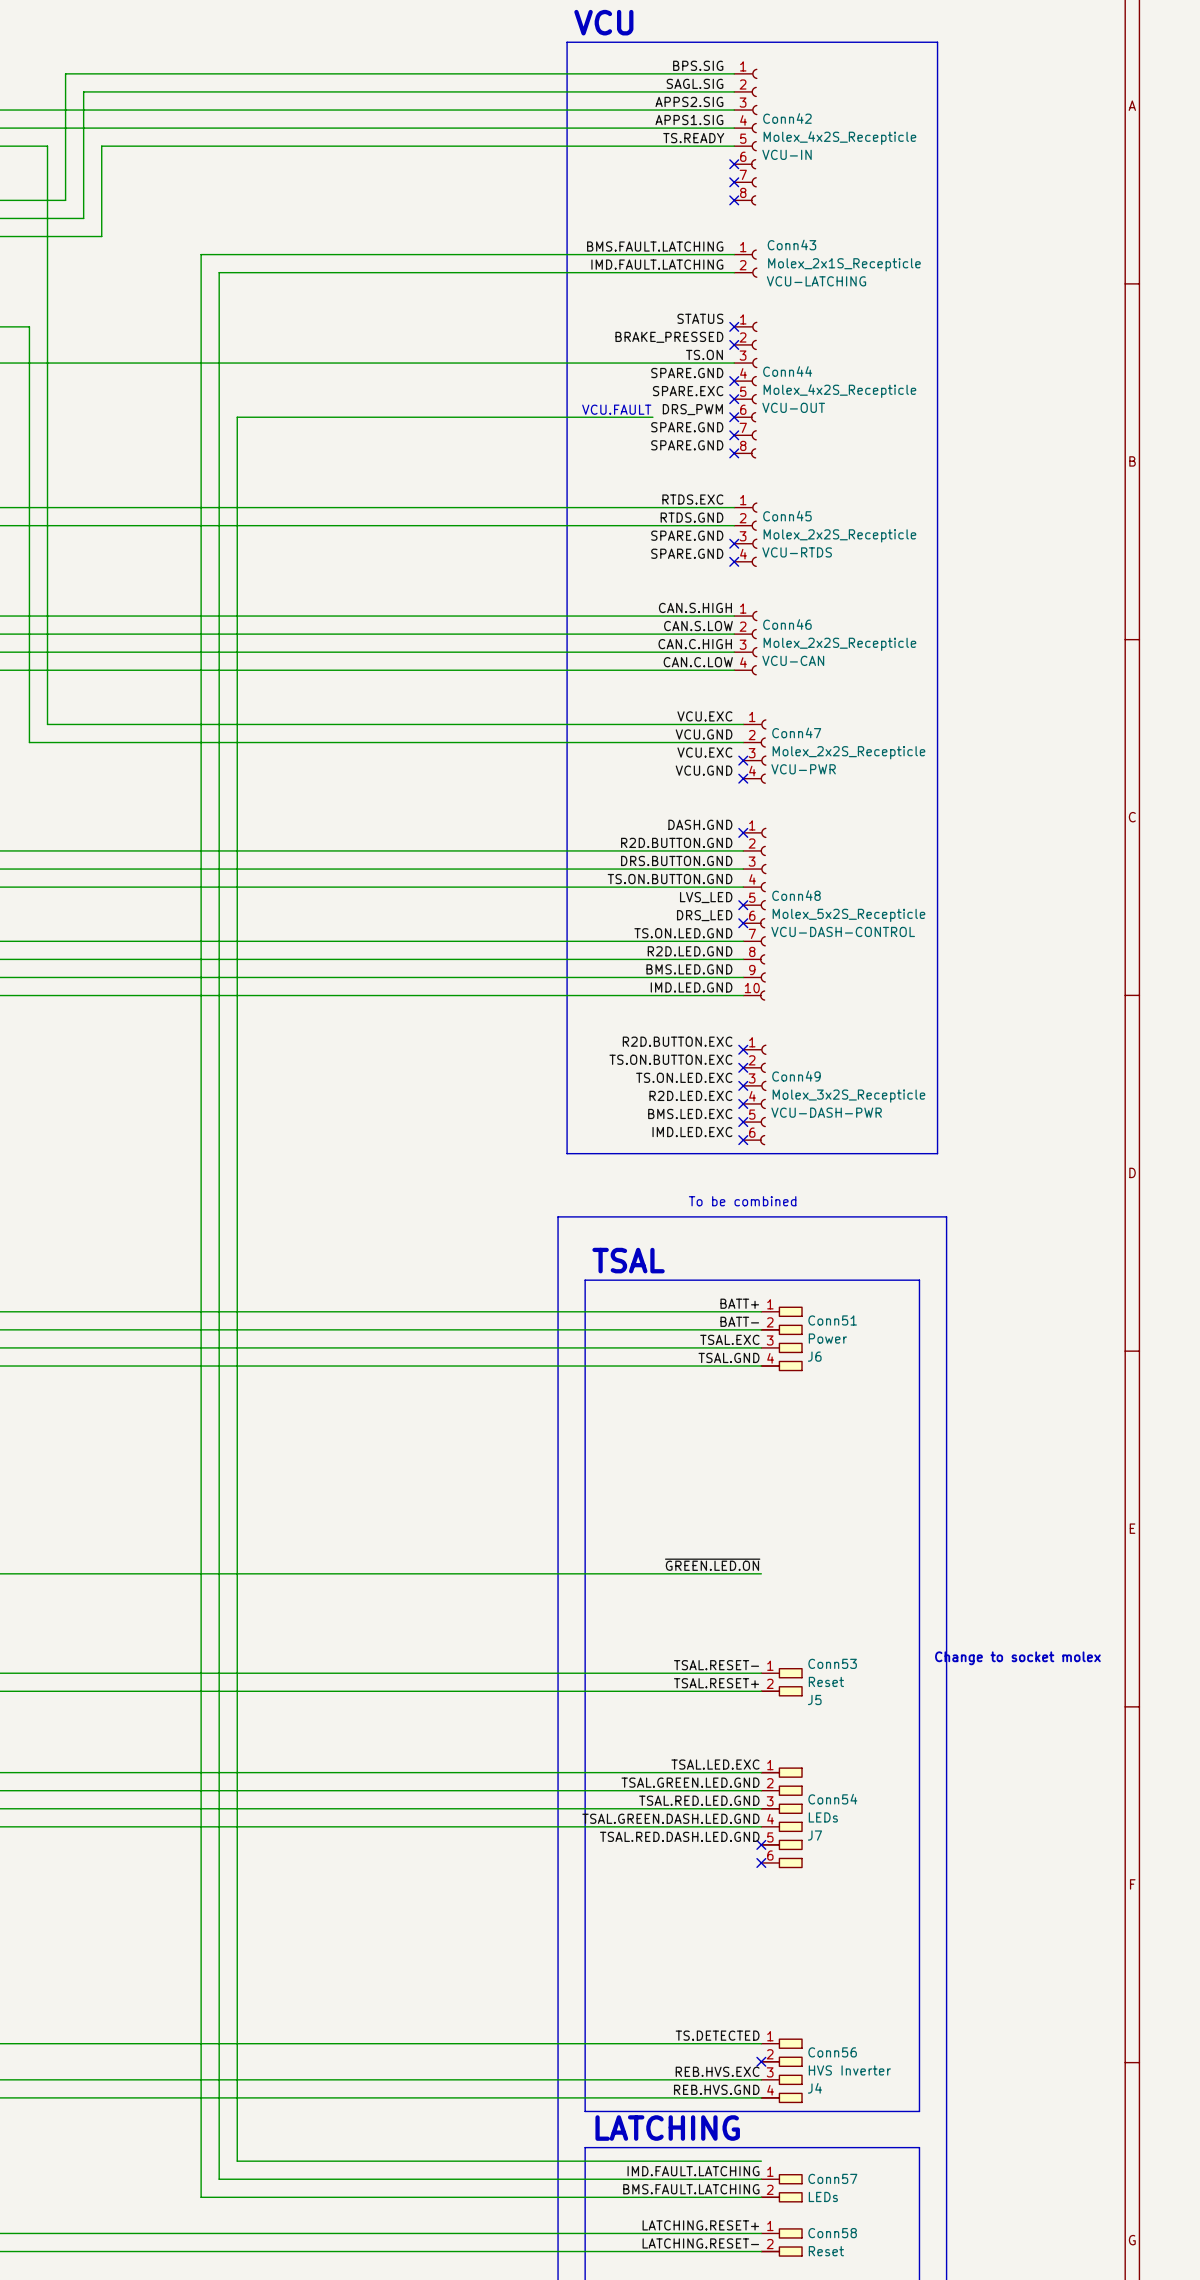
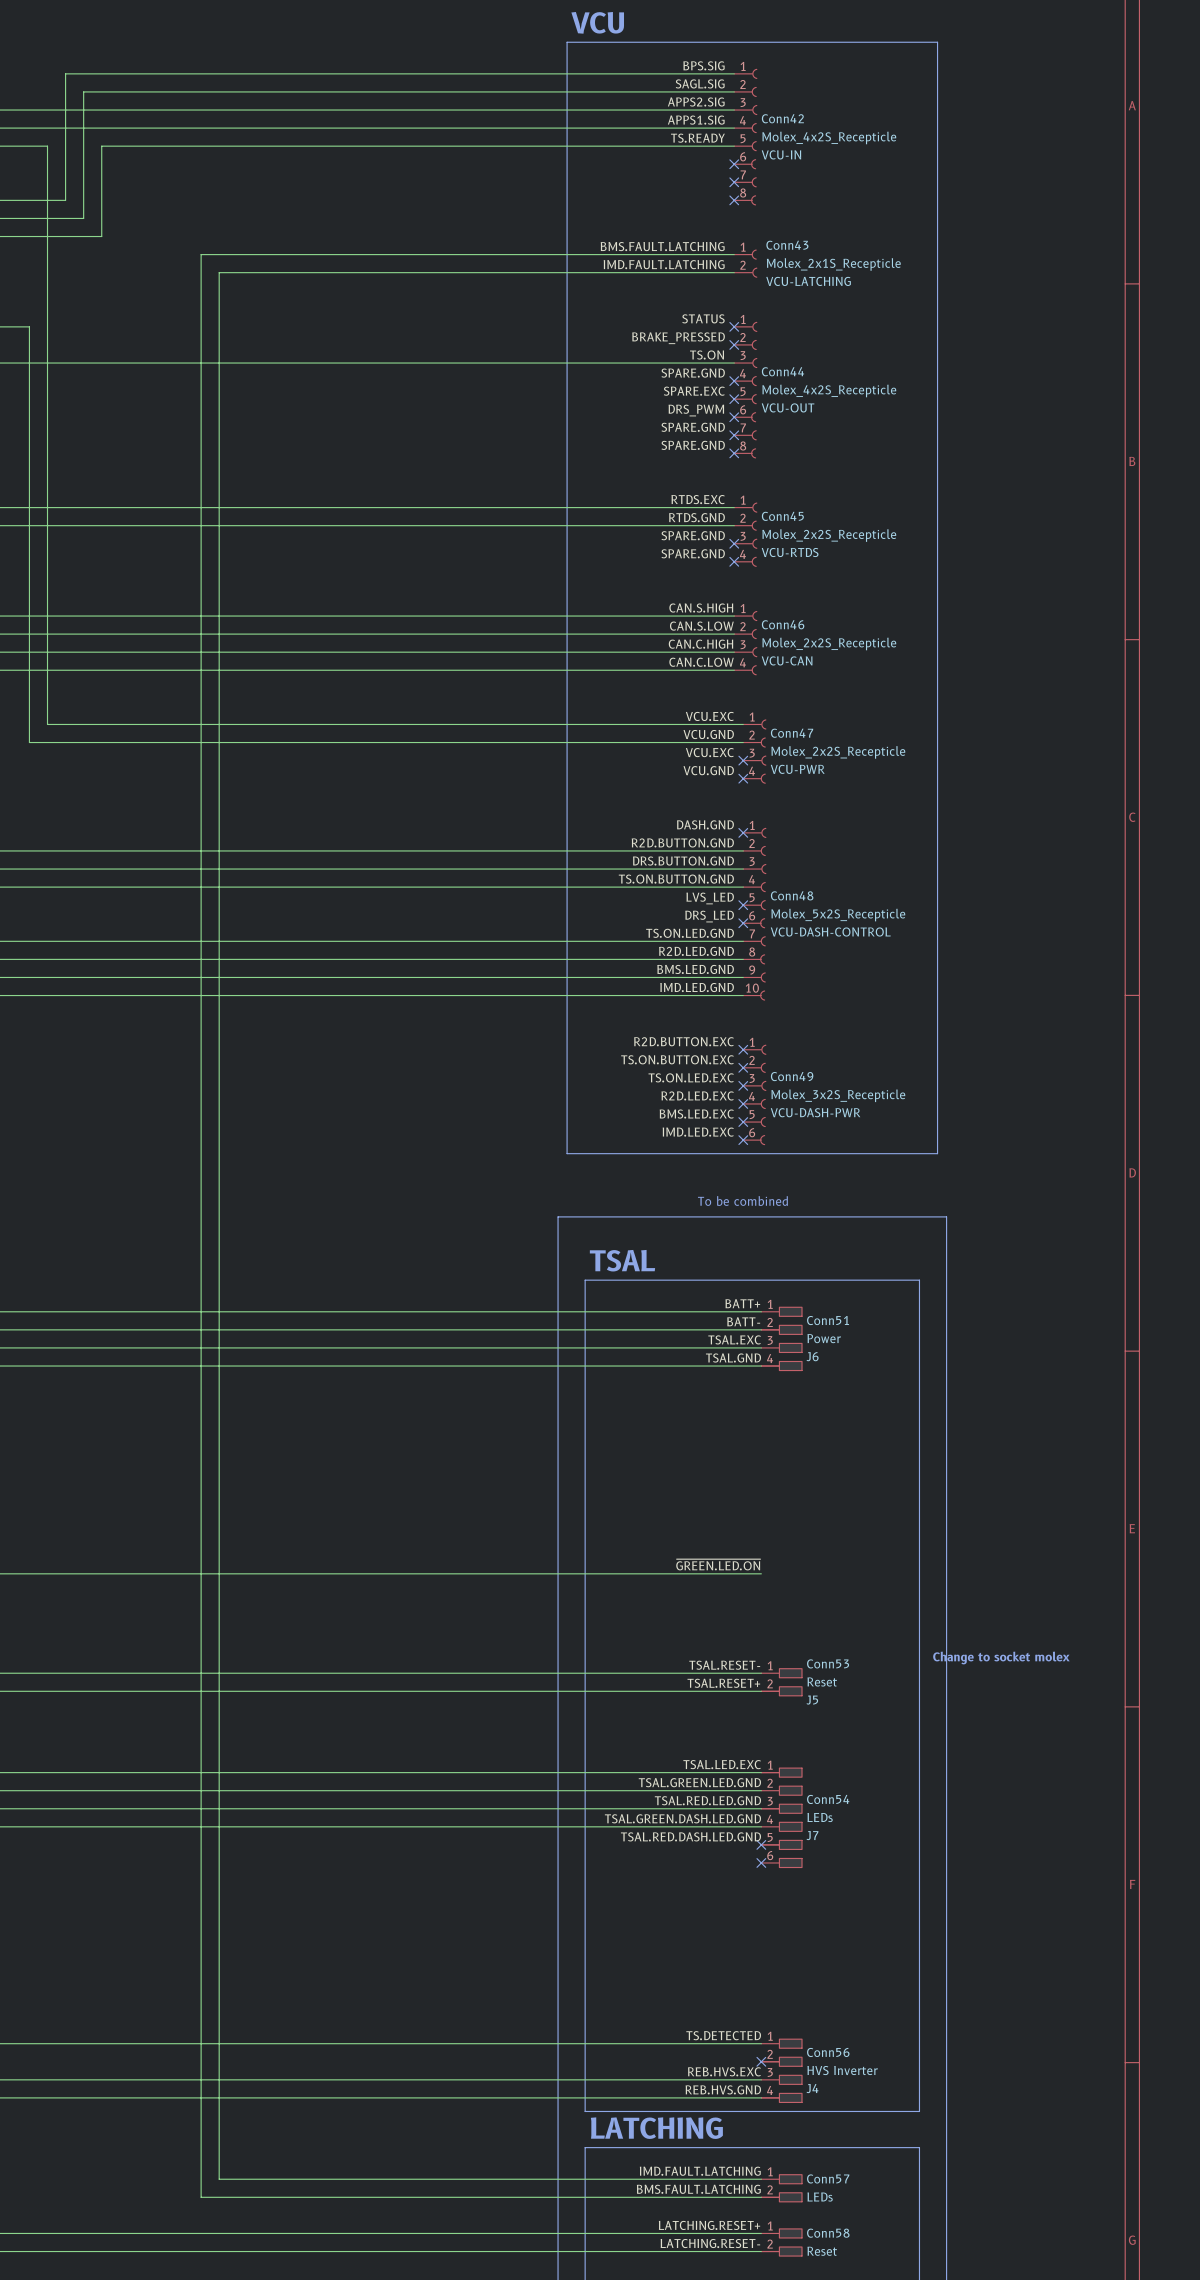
text: VCU.FAULT (616, 409) -> none
wire: (652, 417) (237, 417) (237, 2161) (761, 2161) -> none

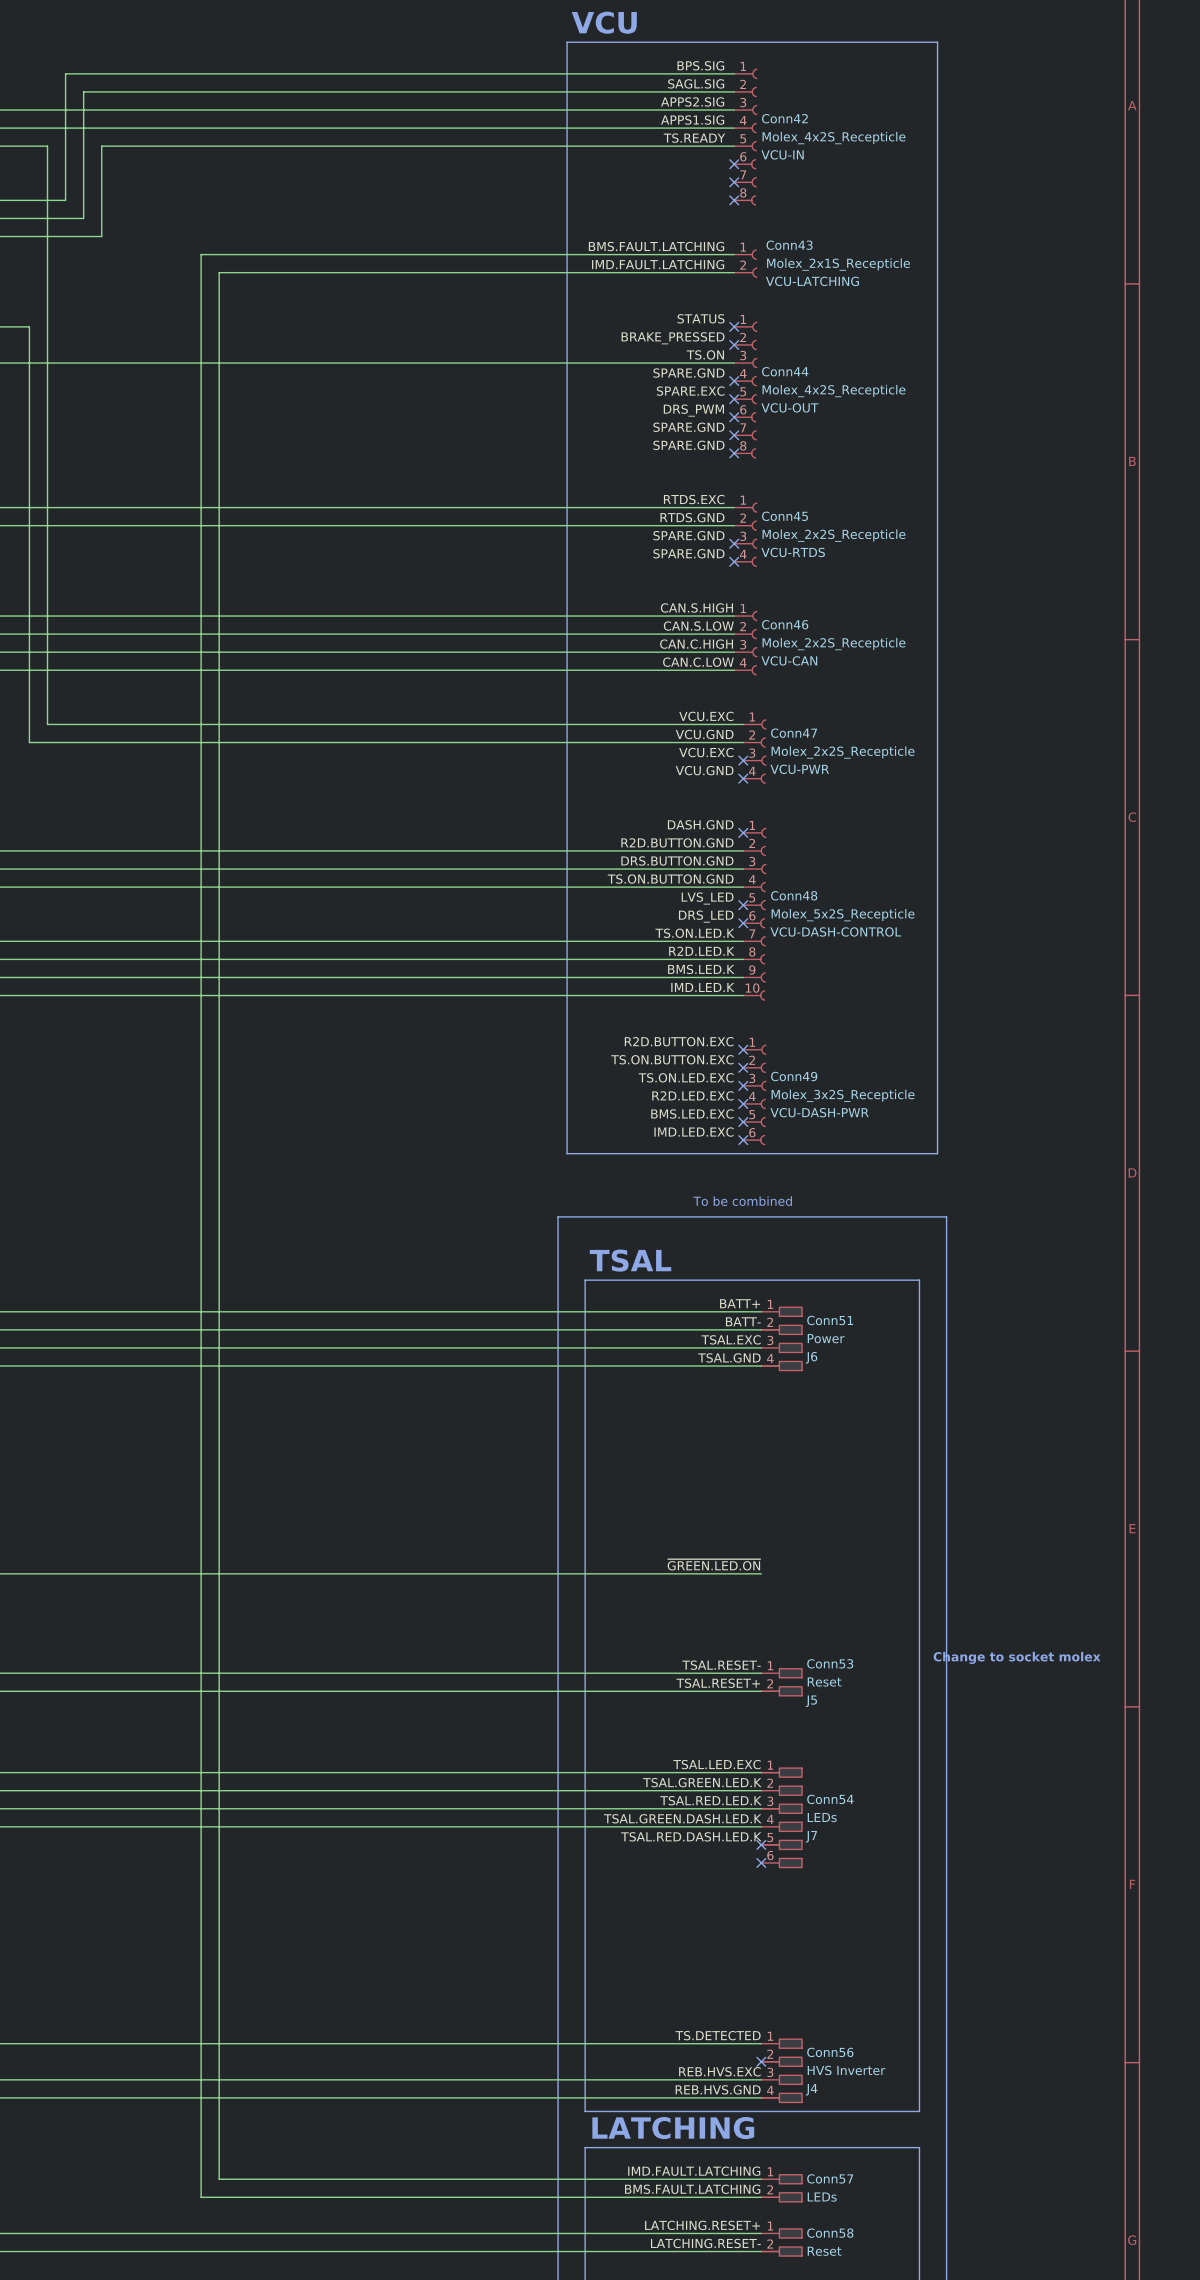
label: TS.ON.LED.GND (690, 933) -> TS.ON.LED.K (695, 933)
label: R2D.LED.GND (696, 951) -> R2D.LED.K (701, 951)
label: BMS.LED.GND (695, 969) -> BMS.LED.K (701, 969)
label: IMD.LED.GND (697, 987) -> IMD.LED.K (702, 987)
label: TSAL.GREEN.LED.GND (699, 1782) -> TSAL.GREEN.LED.K (702, 1782)
label: TSAL.RED.LED.GND (707, 1800) -> TSAL.RED.LED.K (710, 1800)
label: TSAL.GREEN.DASH.LED.GND (682, 1818) -> TSAL.GREEN.DASH.LED.K (682, 1818)
label: TSAL.RED.DASH.LED.GND (690, 1836) -> TSAL.RED.DASH.LED.K (691, 1836)

